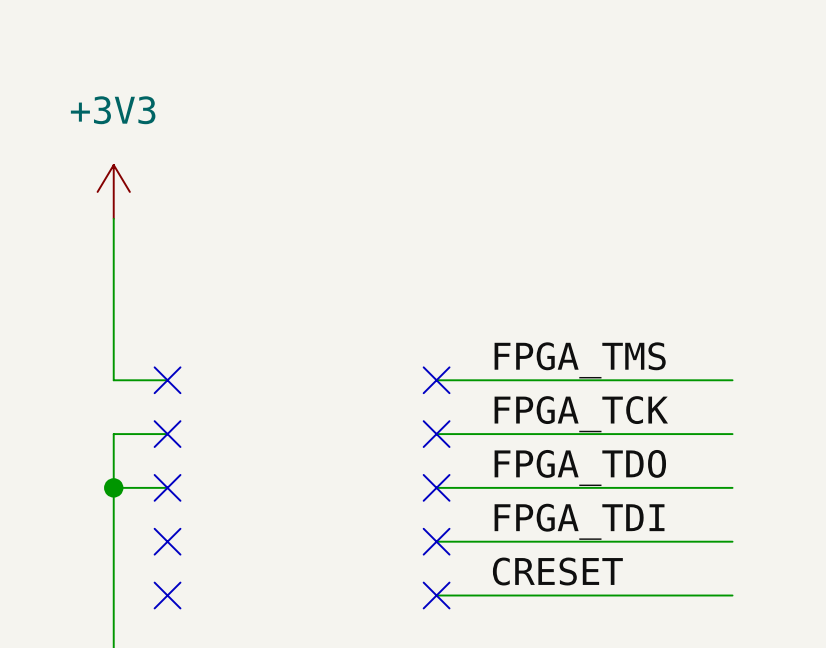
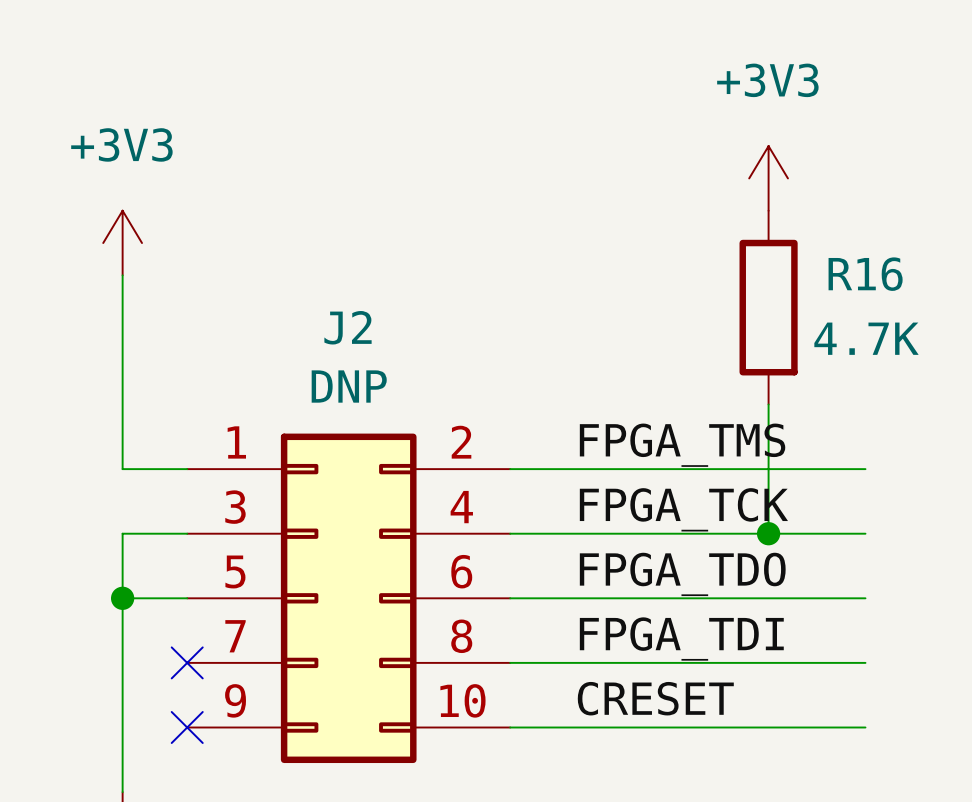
power symbol: none -> +3V3 (768, 178)
R16: none -> 4.7K (768, 307)
wire: none -> (768, 404) (768, 533)
no-connect mark: (167, 380) -> none
no-connect mark: (436, 380) -> none
no-connect mark: (167, 434) -> none
no-connect mark: (436, 434) -> none
junction: none -> (768, 533)
no-connect mark: (167, 487) -> none
J2: none -> DNP (348, 598)
no-connect mark: (436, 487) -> none
no-connect mark: (436, 541) -> none
no-connect mark: (436, 595) -> none

